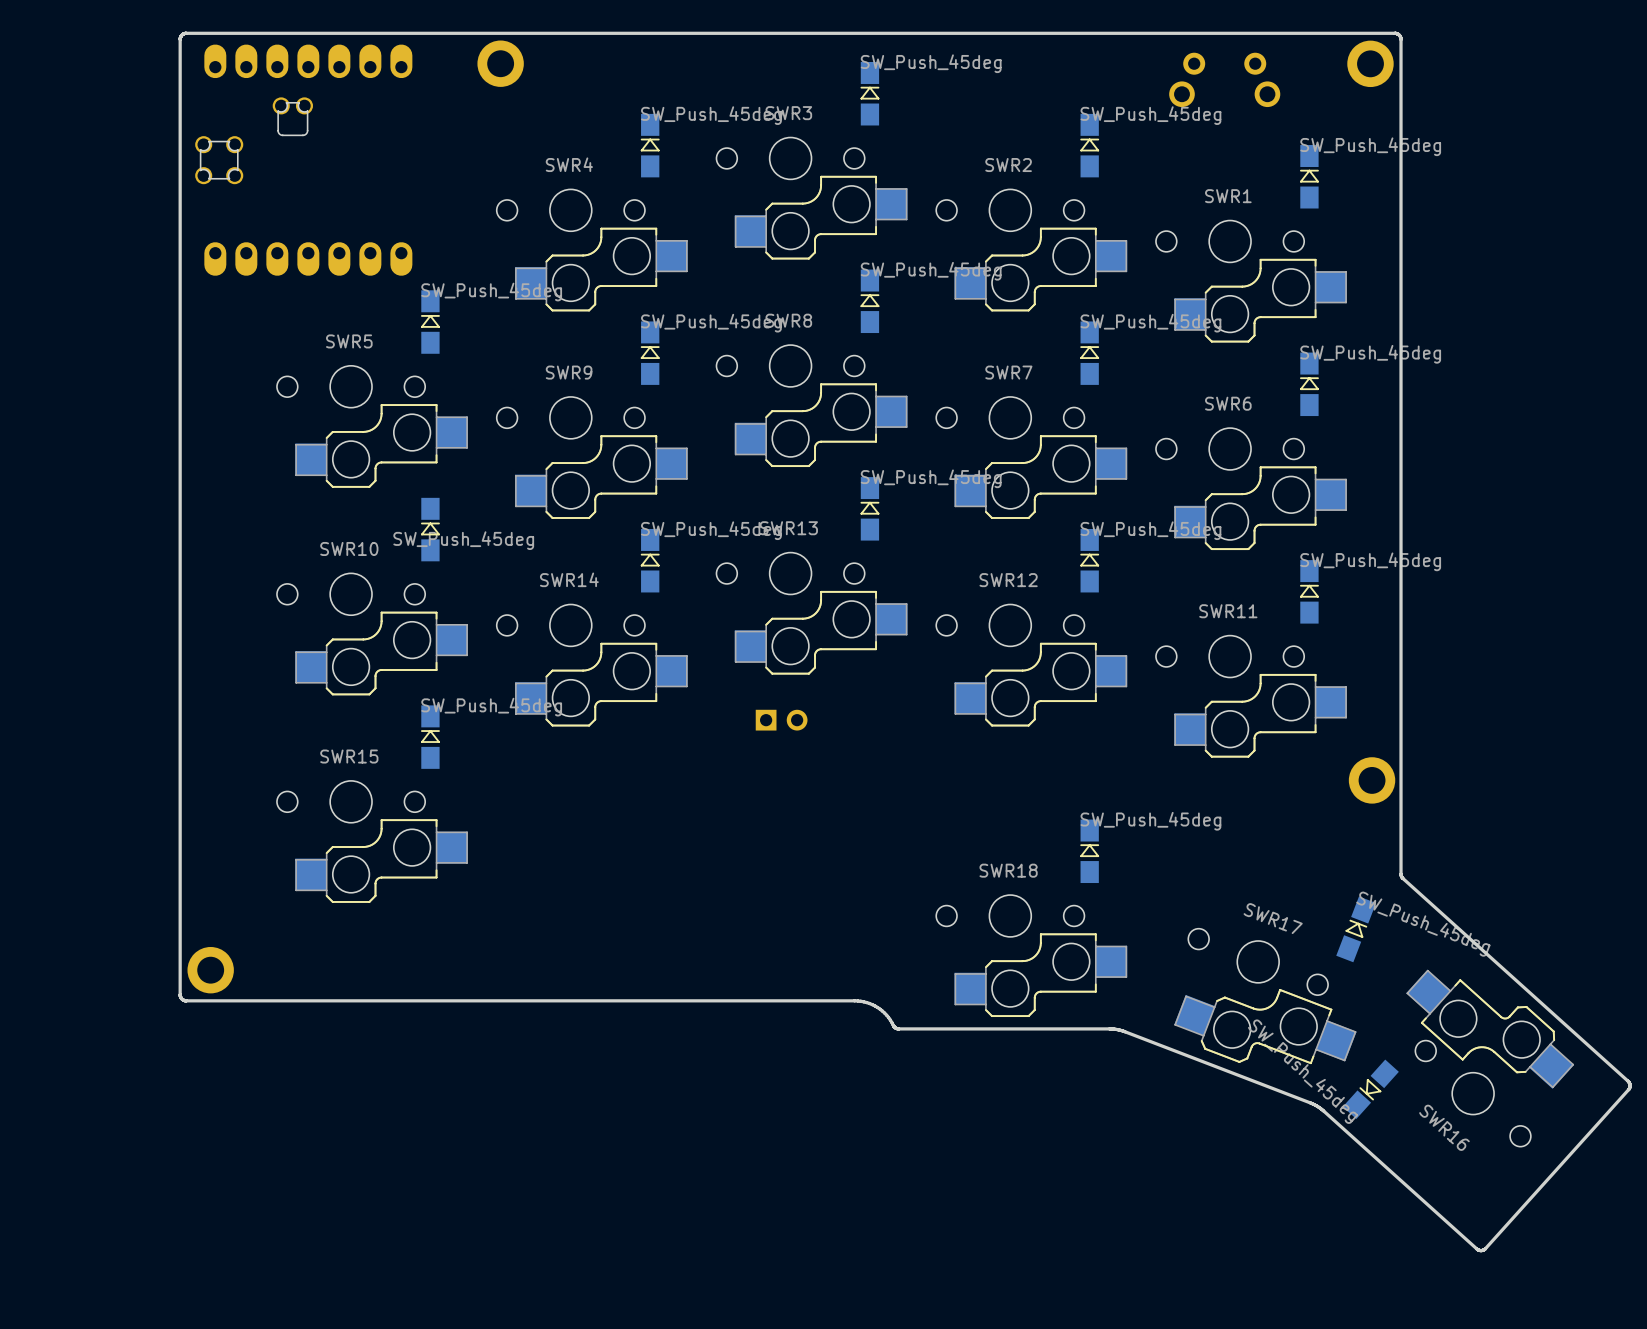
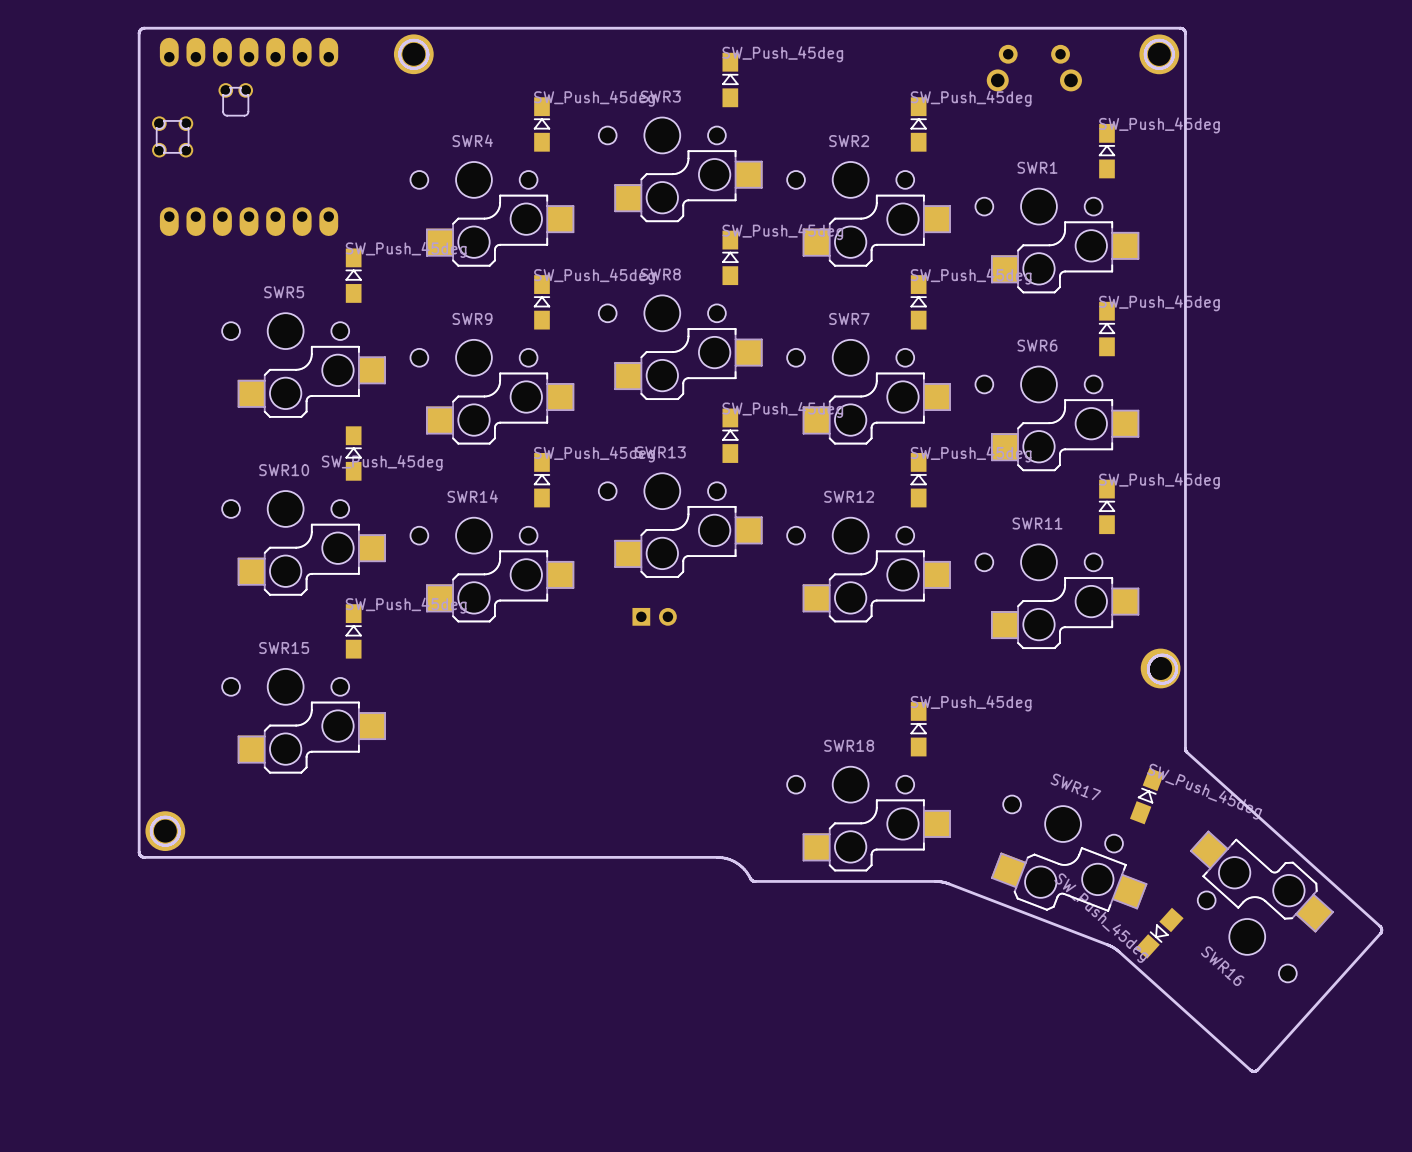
board edge: none -> (414, 40) (424, 45) (427, 55) (423, 64) (412, 68) (403, 63) (399, 53) (404, 43) (414, 40)
board edge: none -> (1160, 40) (1169, 45) (1173, 55) (1168, 64) (1158, 68) (1148, 63) (1145, 53) (1149, 43) (1160, 40)
board edge: none -> (1163, 655) (1173, 659) (1176, 670) (1171, 679) (1161, 683) (1151, 678) (1148, 668) (1153, 658) (1163, 655)
board edge: none -> (166, 817) (175, 821) (179, 832) (174, 841) (164, 845) (154, 840) (151, 830) (155, 820) (166, 817)

